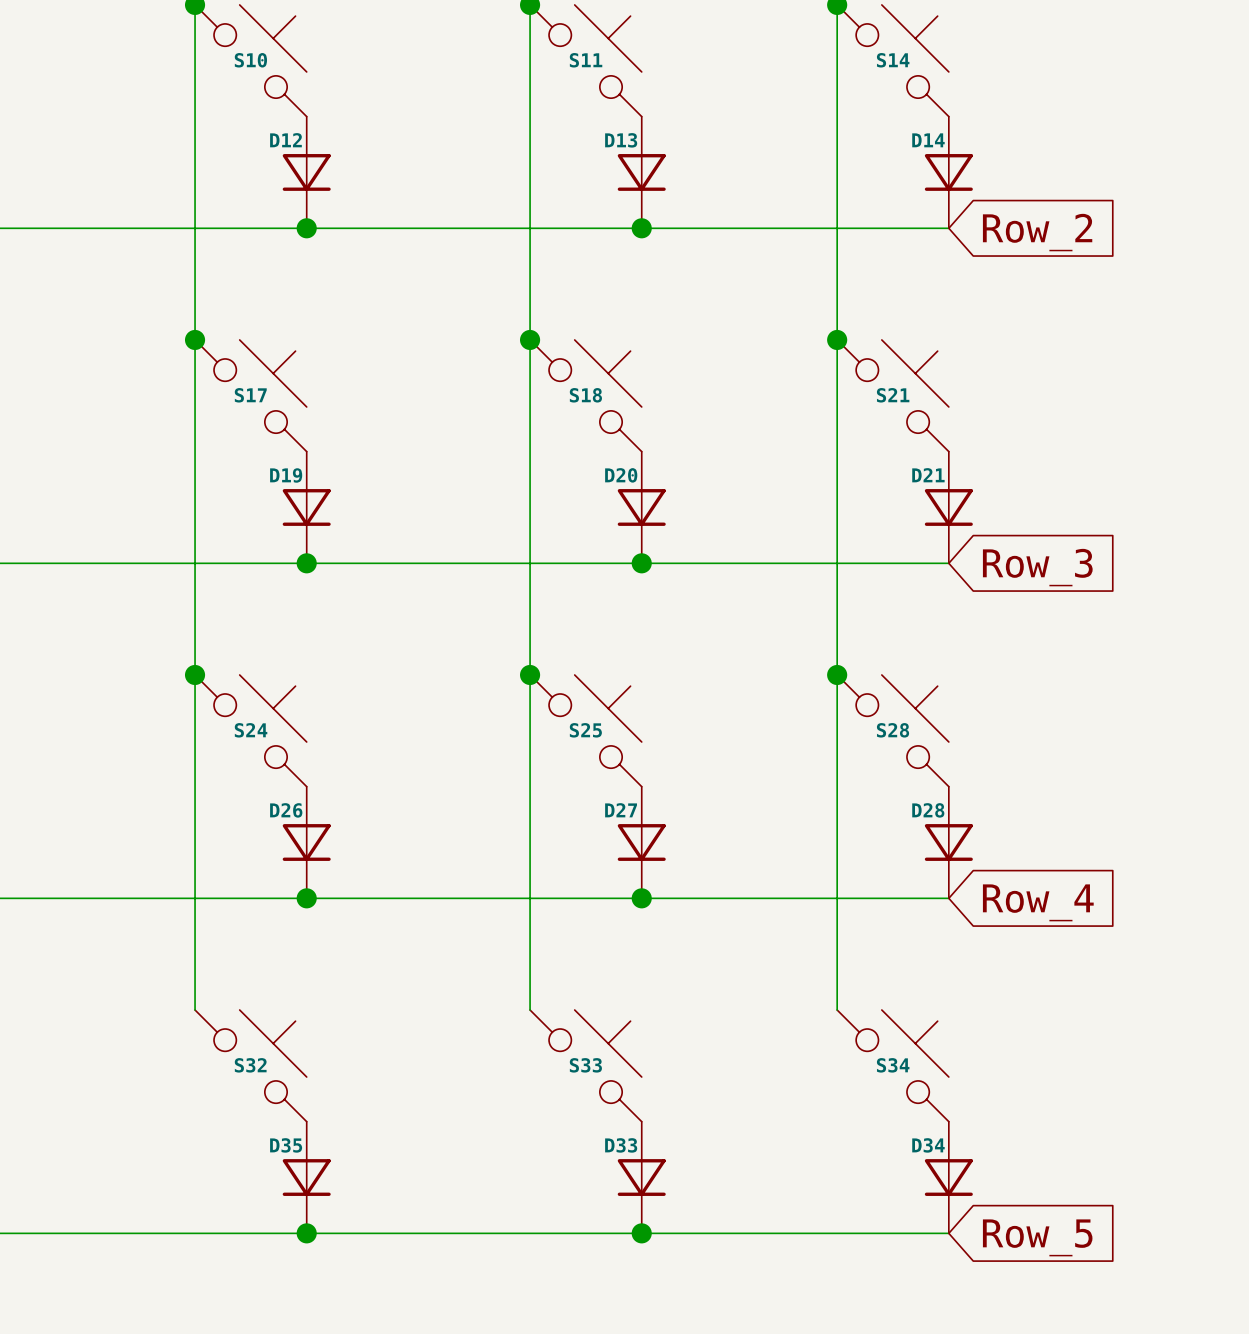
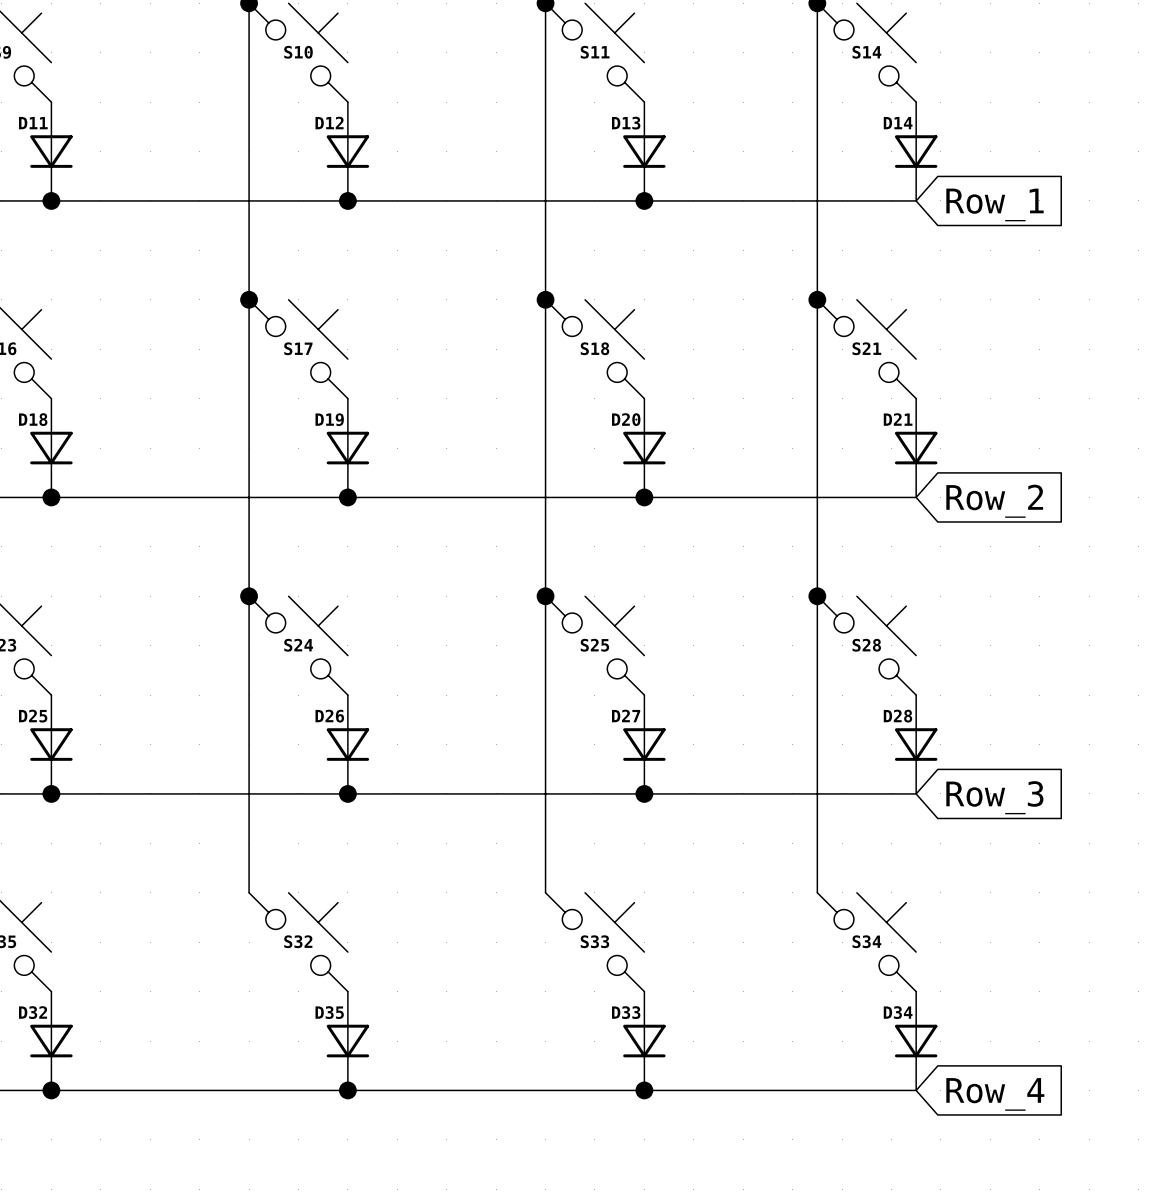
global label: Row_2 (1037, 232) -> Row_1 (995, 204)
global label: Row_3 (1037, 567) -> Row_2 (994, 501)
global label: Row_4 (1038, 902) -> Row_3 (994, 797)
global label: Row_5 (1037, 1237) -> Row_4 (995, 1094)

